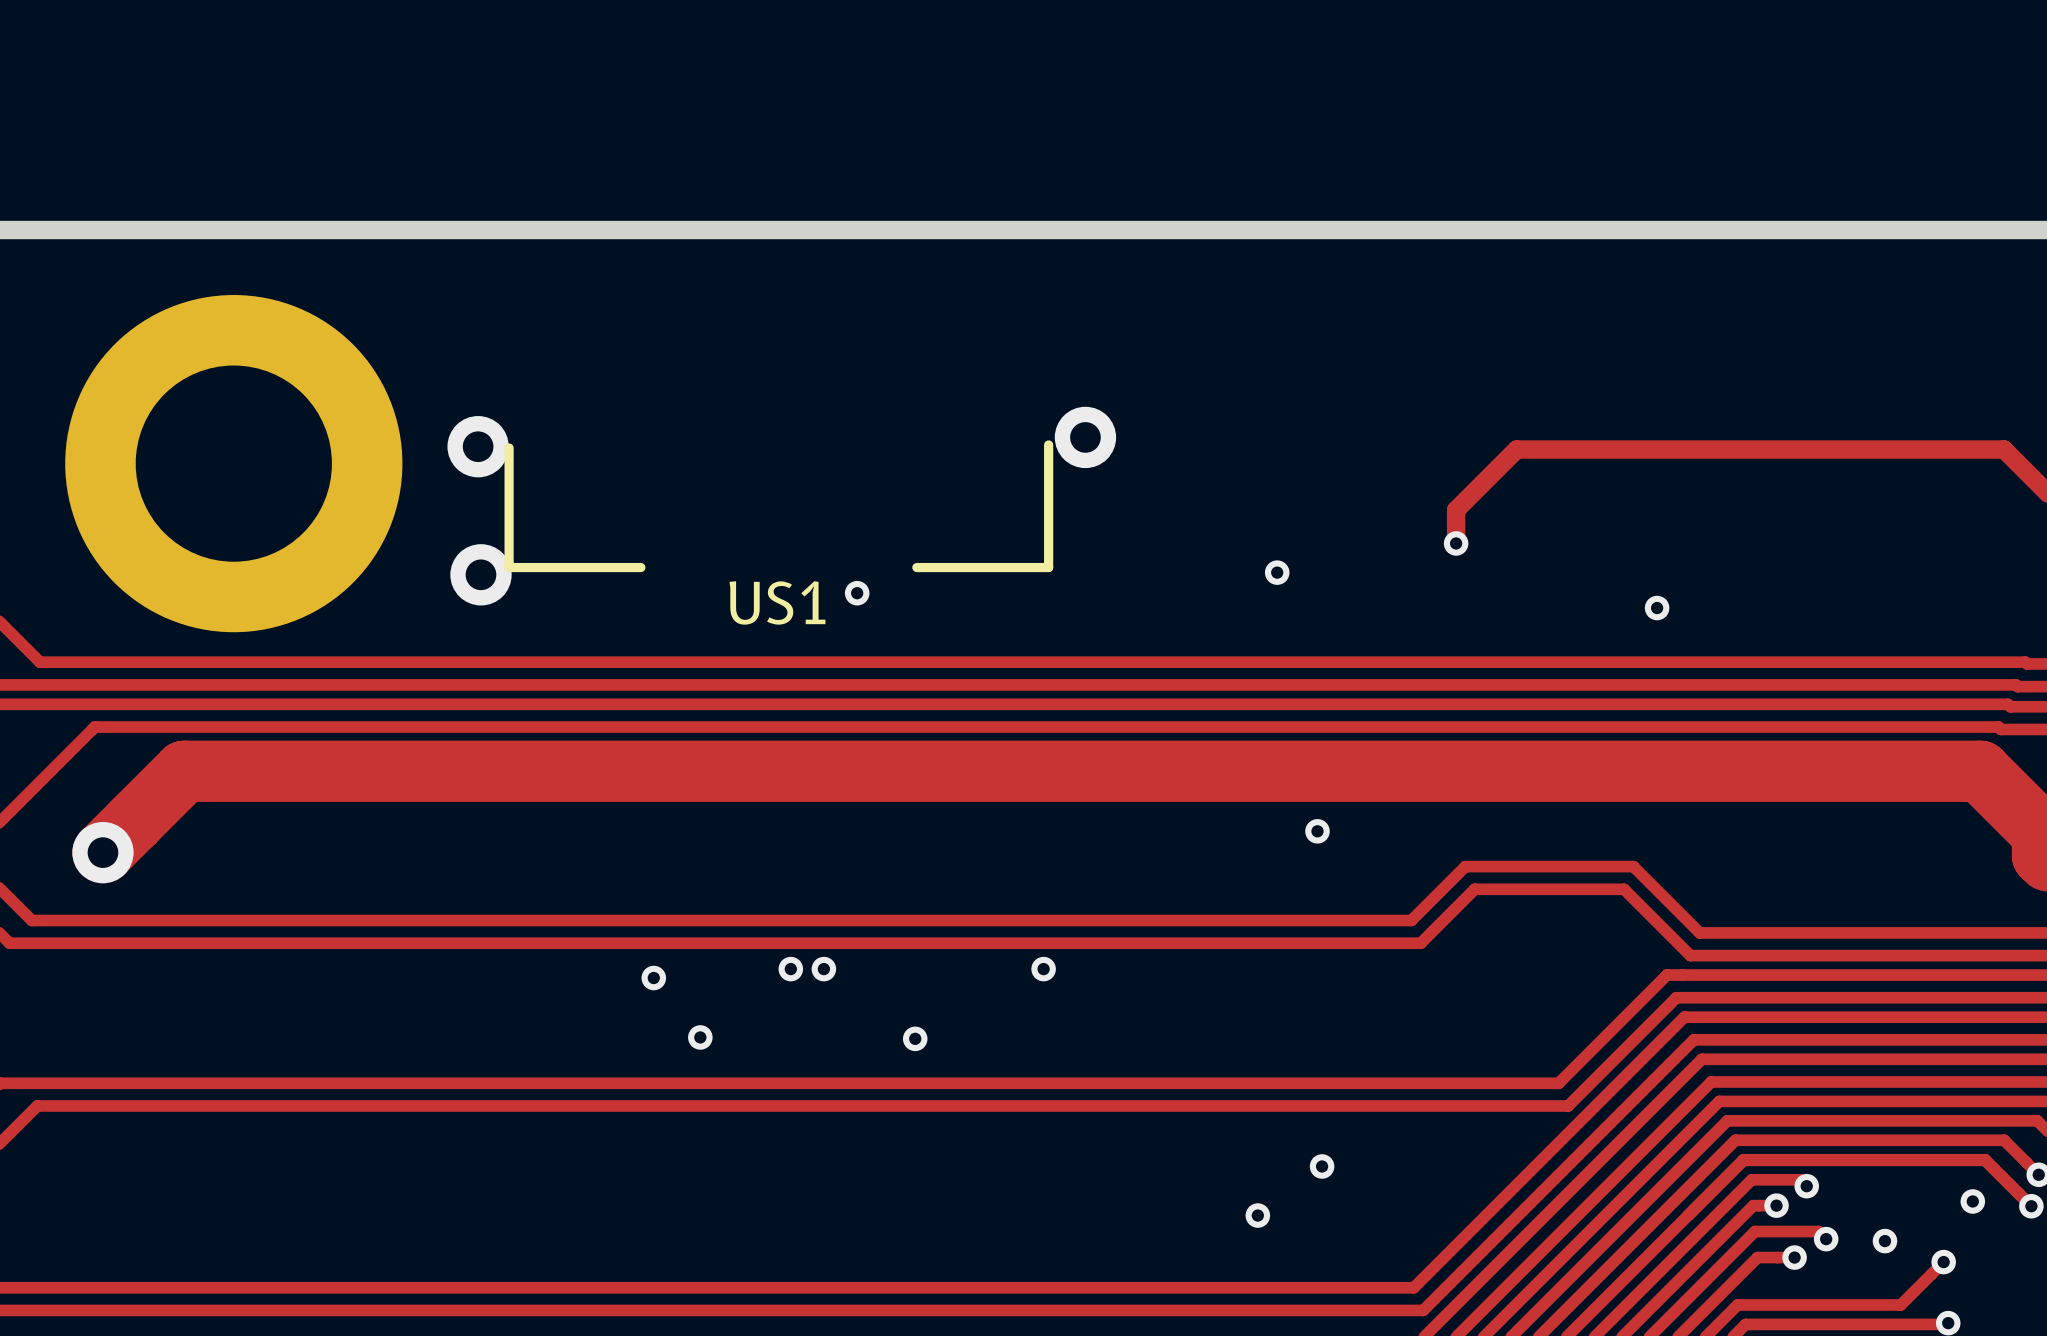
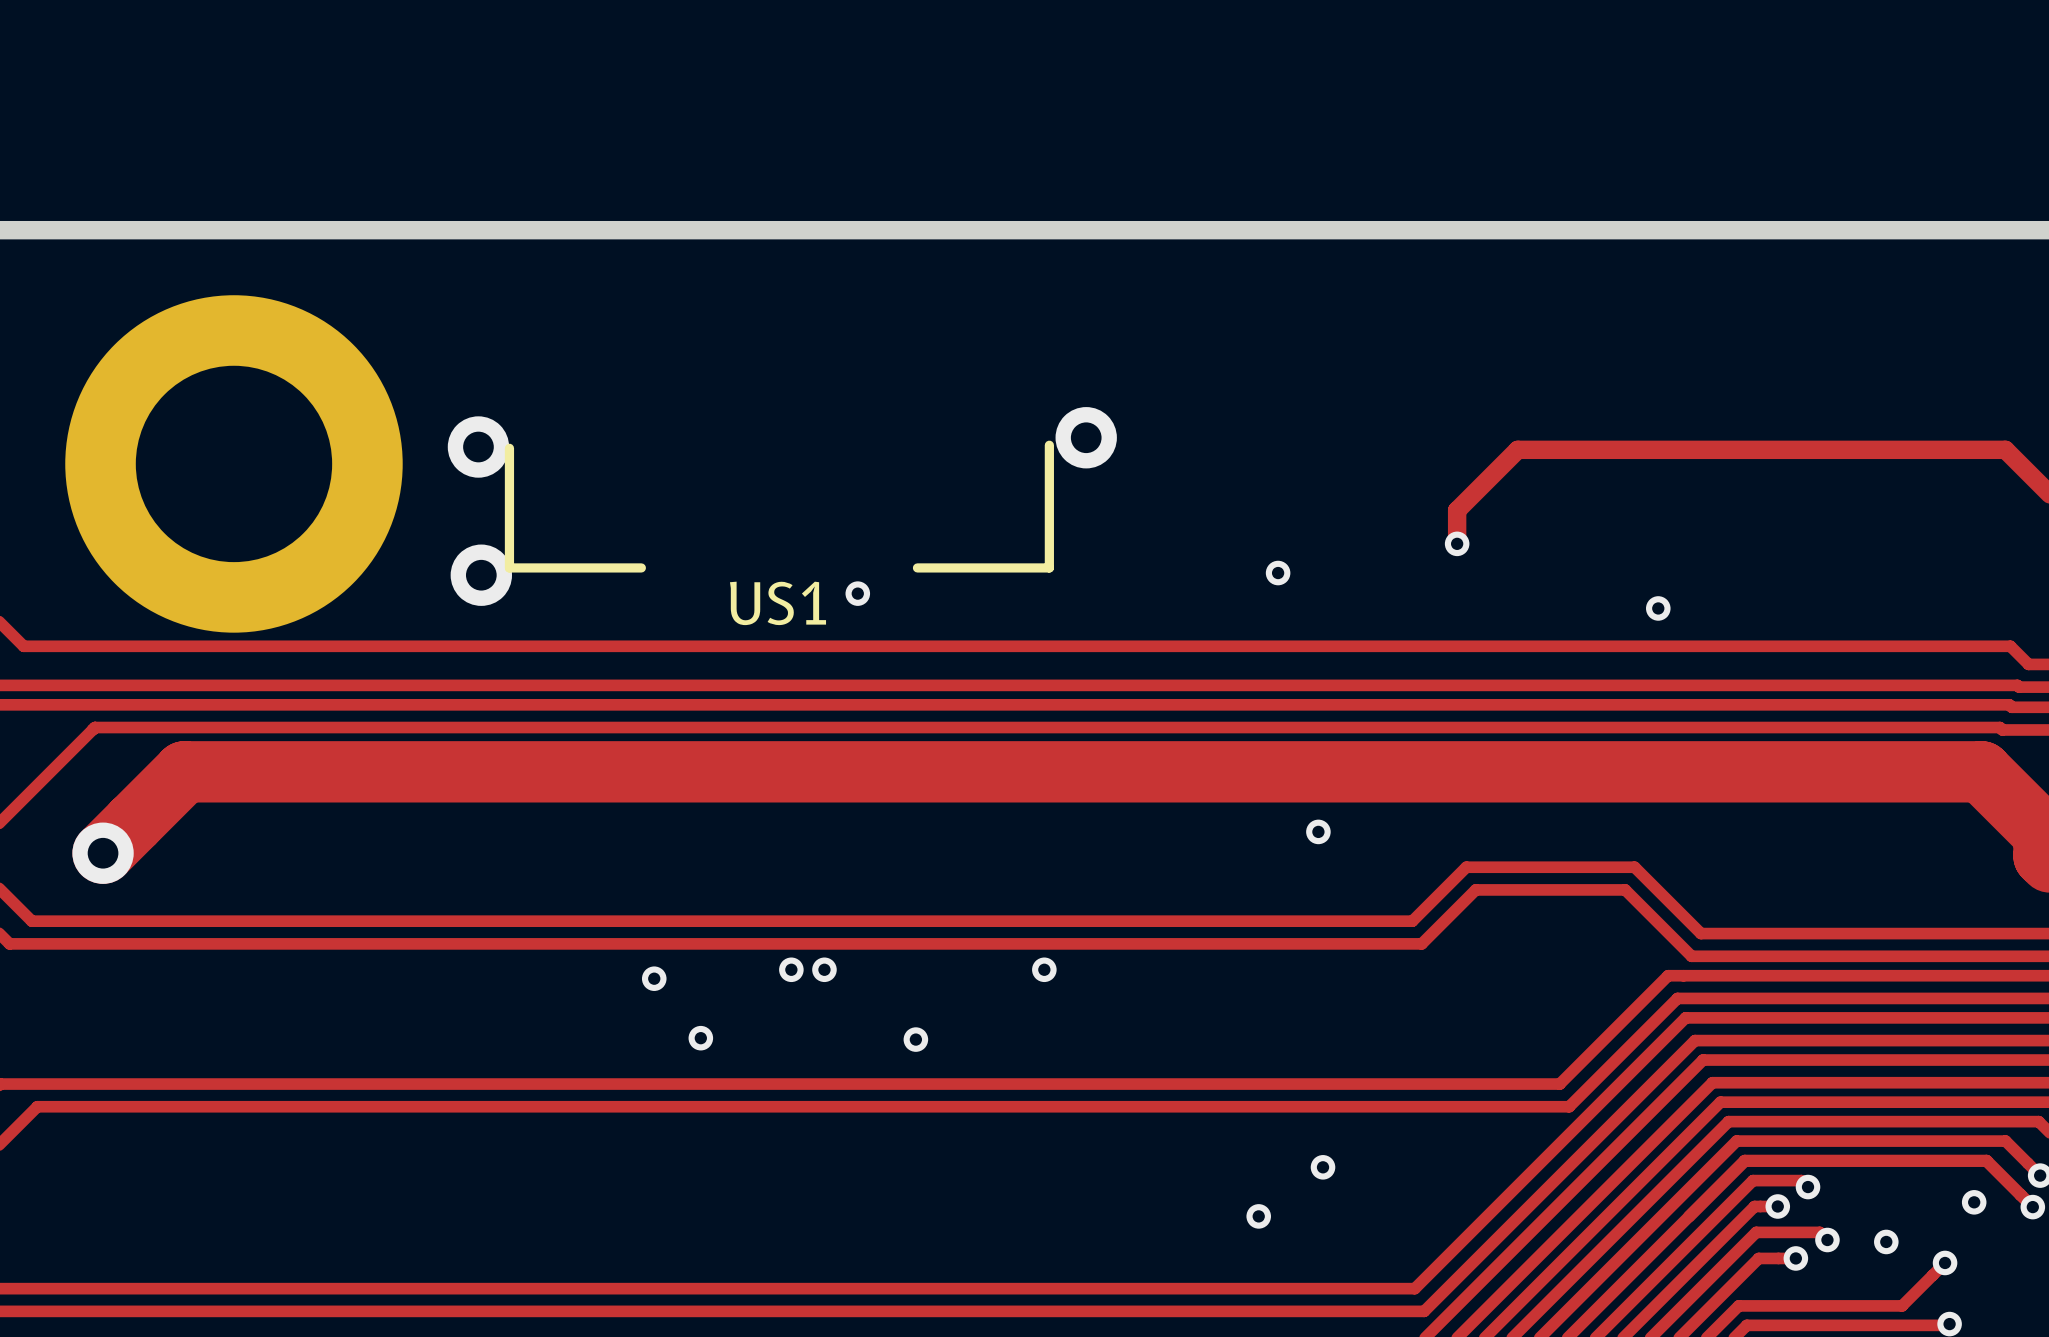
track: (23, 645) (40, 662) (2025, 662) -> (23, 646) (2010, 646) (2026, 662)

